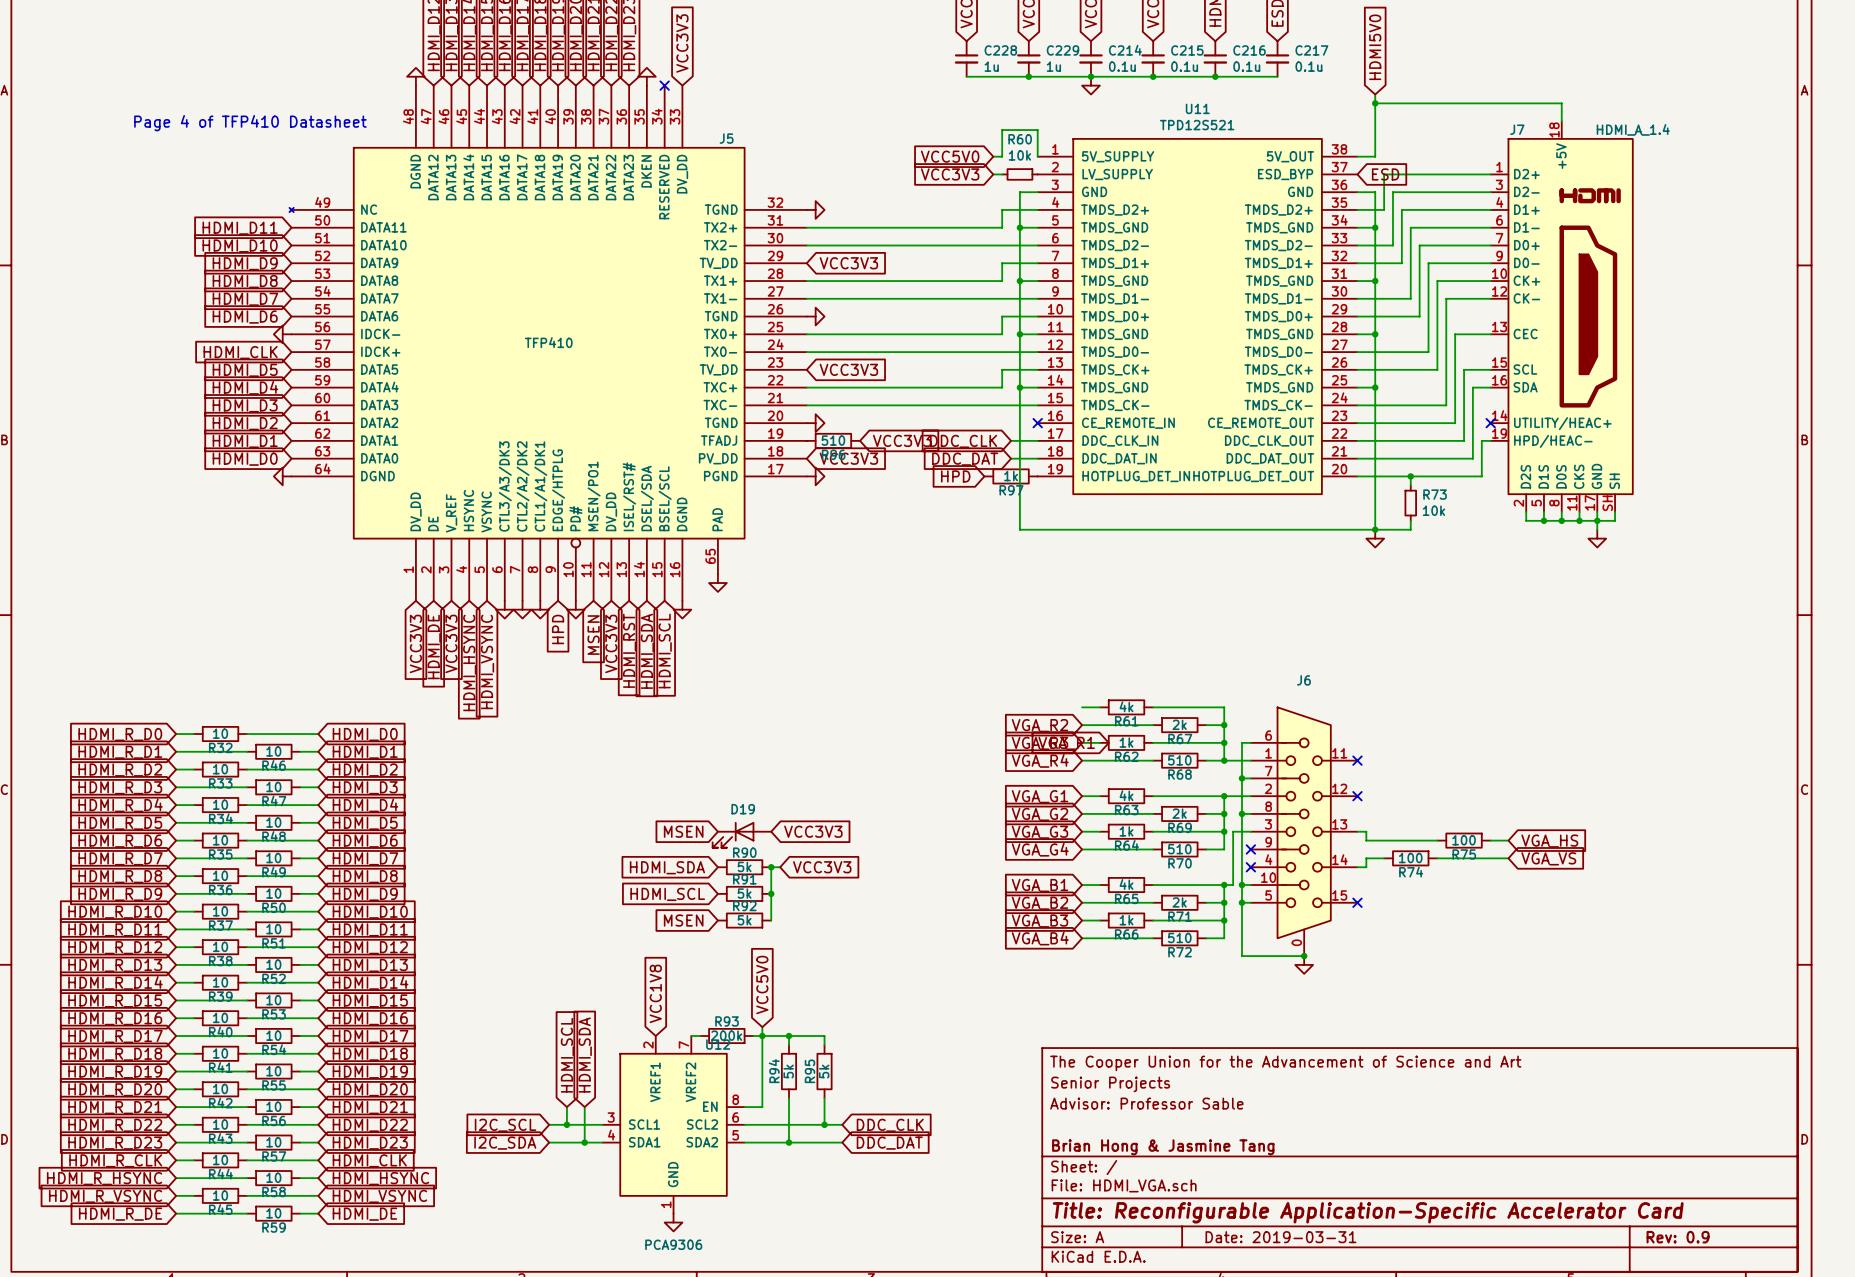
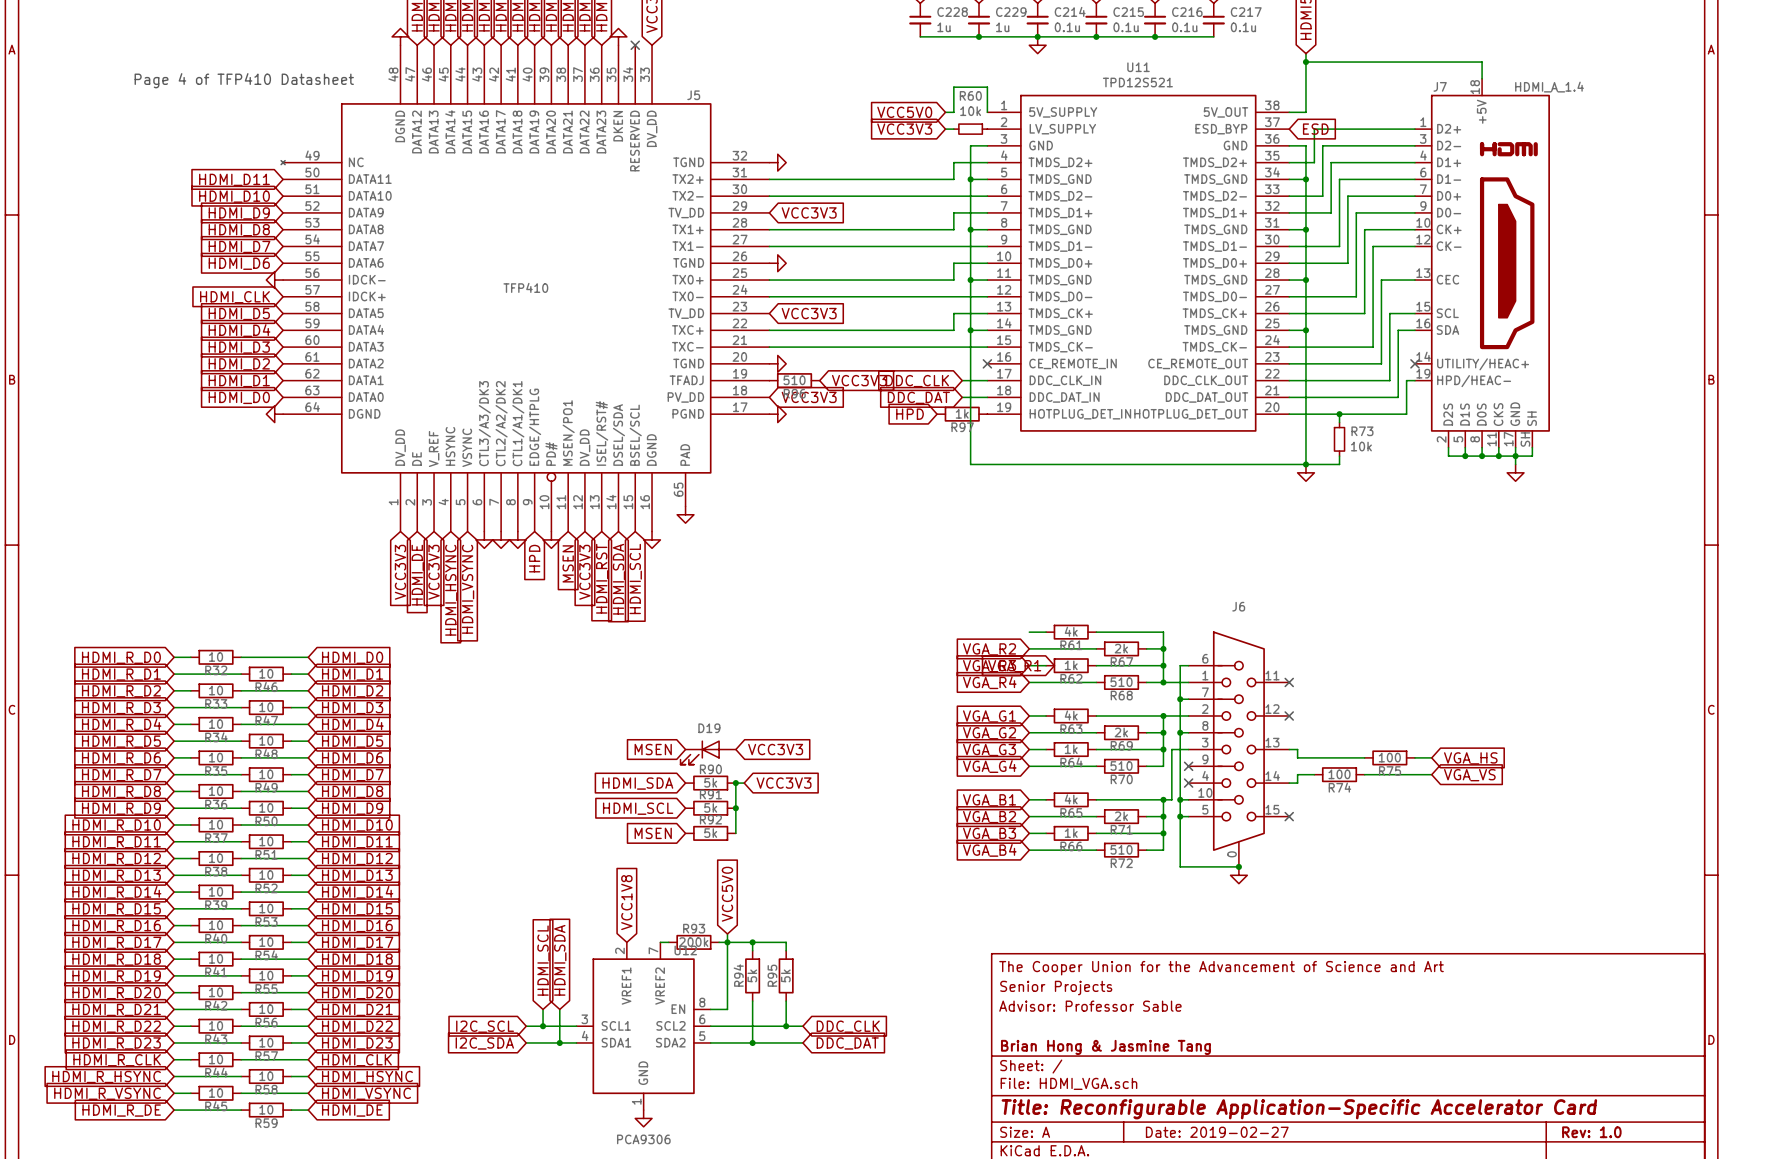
title block: Date: 2019-03-31 (1280, 1237) -> Date: 2019-02-27 (1217, 1132)
title block: Rev: 0.9 (1678, 1237) -> Rev: 1.0 (1591, 1132)

